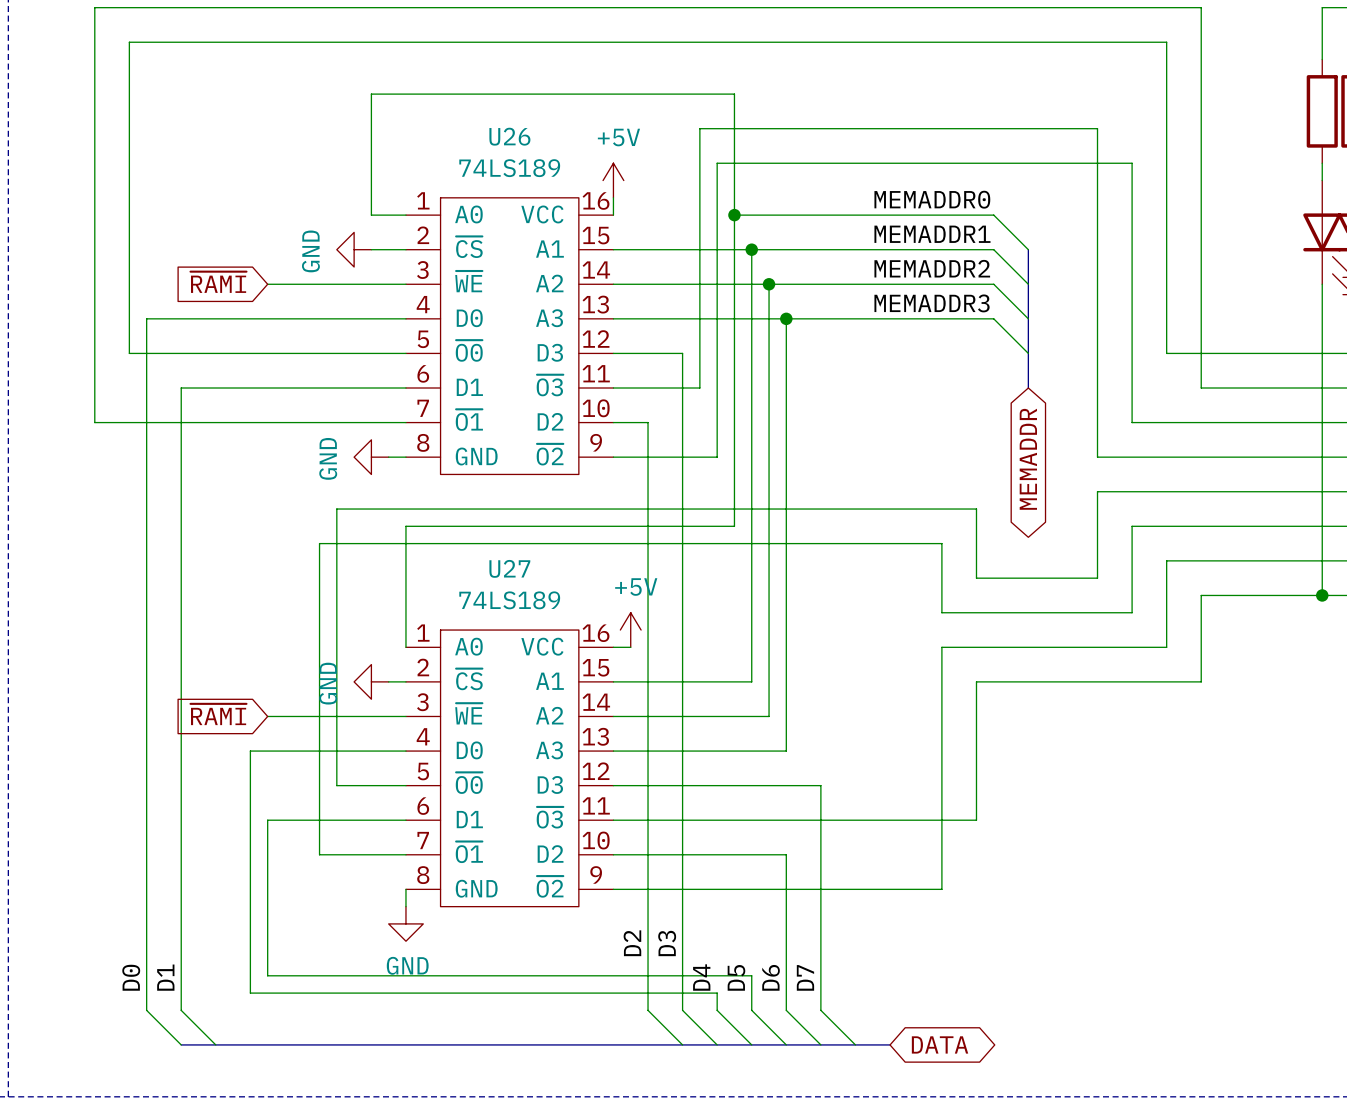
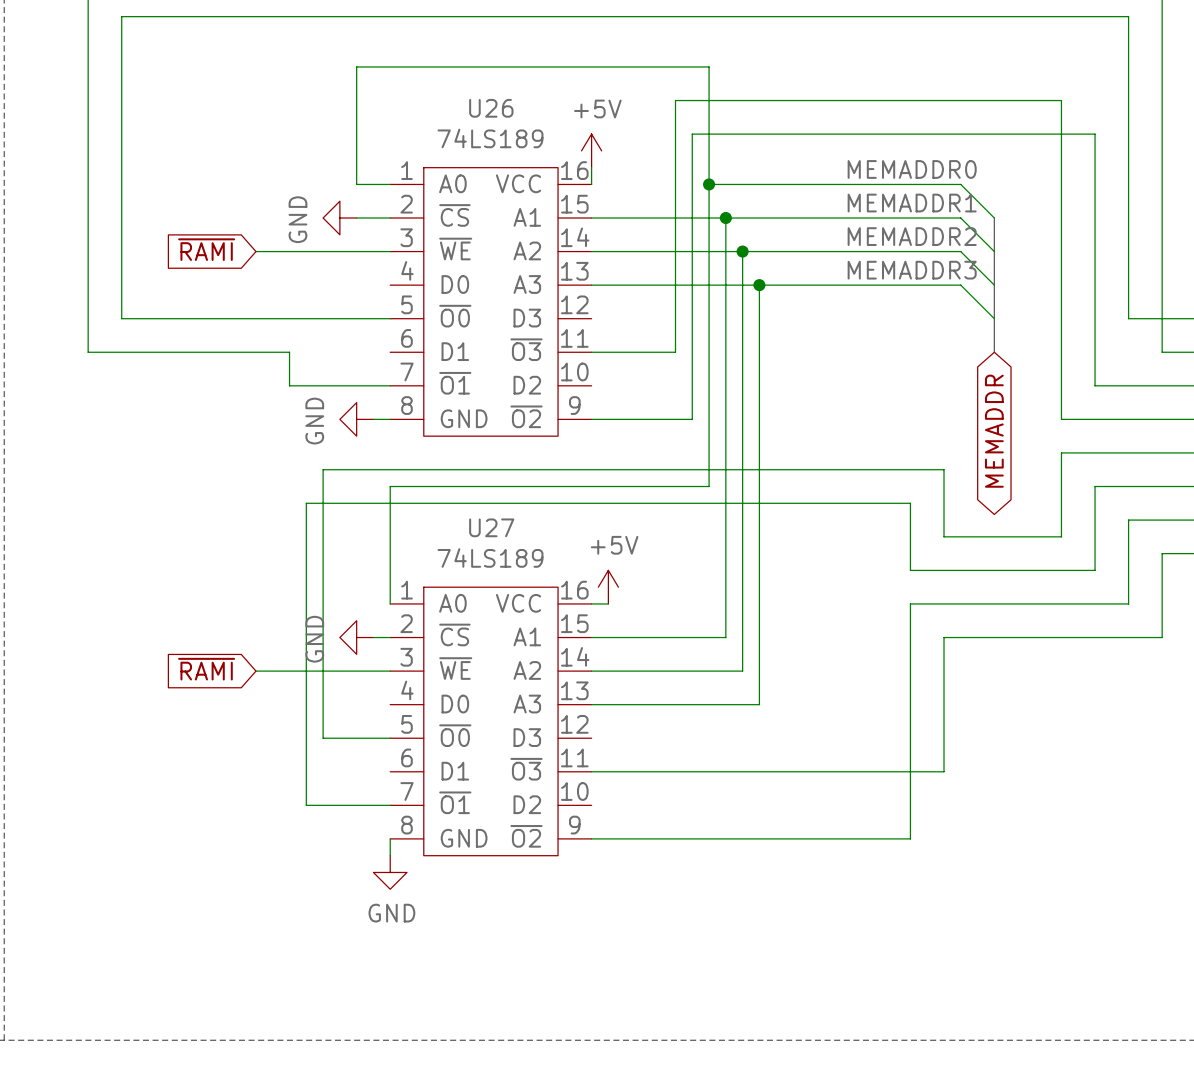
wire: (405, 318) (146, 318) (146, 1010) (181, 1044) -> none
wire: (613, 353) (682, 353) (682, 1010) (717, 1044) -> none
wire: (94, 388) (94, 422) (302, 422) -> (88, 352) (172, 352)
wire: (181, 388) (181, 1010) (215, 1044) -> none
wire: (302, 388) (405, 388) -> (289, 352) (289, 385)
wire: (613, 422) (648, 422) (648, 1010) (682, 1044) -> none
wire: (405, 751) (250, 751) (250, 993) (717, 993) (717, 1010) (751, 1044) -> none
wire: (613, 785) (820, 785) (820, 1010) (855, 1044) -> none
wire: (405, 820) (267, 820) (267, 975) (751, 975) (751, 1010) (786, 1044) -> none
wire: (613, 854) (786, 854) (786, 1010) (820, 1044) -> none
label: D2 (632, 943) -> none
label: D3 (667, 943) -> none
label: D0 (131, 977) -> none
label: D1 (165, 977) -> none
label: D4 (701, 977) -> none
label: D5 (736, 977) -> none
label: D6 (771, 977) -> none
label: D7 (805, 977) -> none
bus: (181, 1044) (890, 1044) -> none
global label: DATA (940, 1044) -> none

